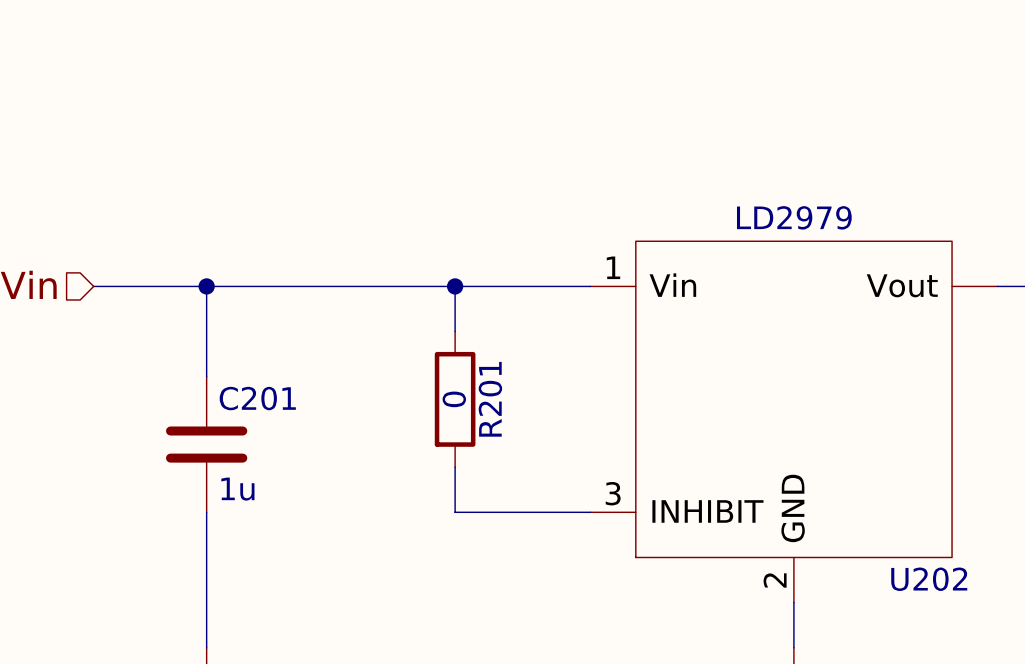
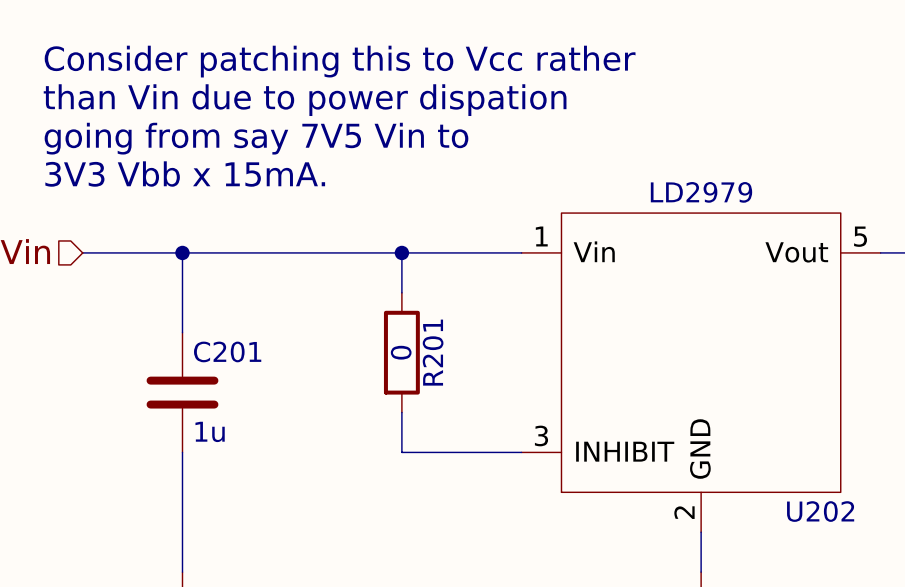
text: none -> Consider patching this to Vcc rather (340, 61)
text: none -> than Vin due to power dispation (305, 100)
text: none -> going from say 7V5 Vin to (256, 138)
text: none -> 3V3 Vbb x 15mA. (185, 174)
U202 pin number: none -> 5 (860, 236)

